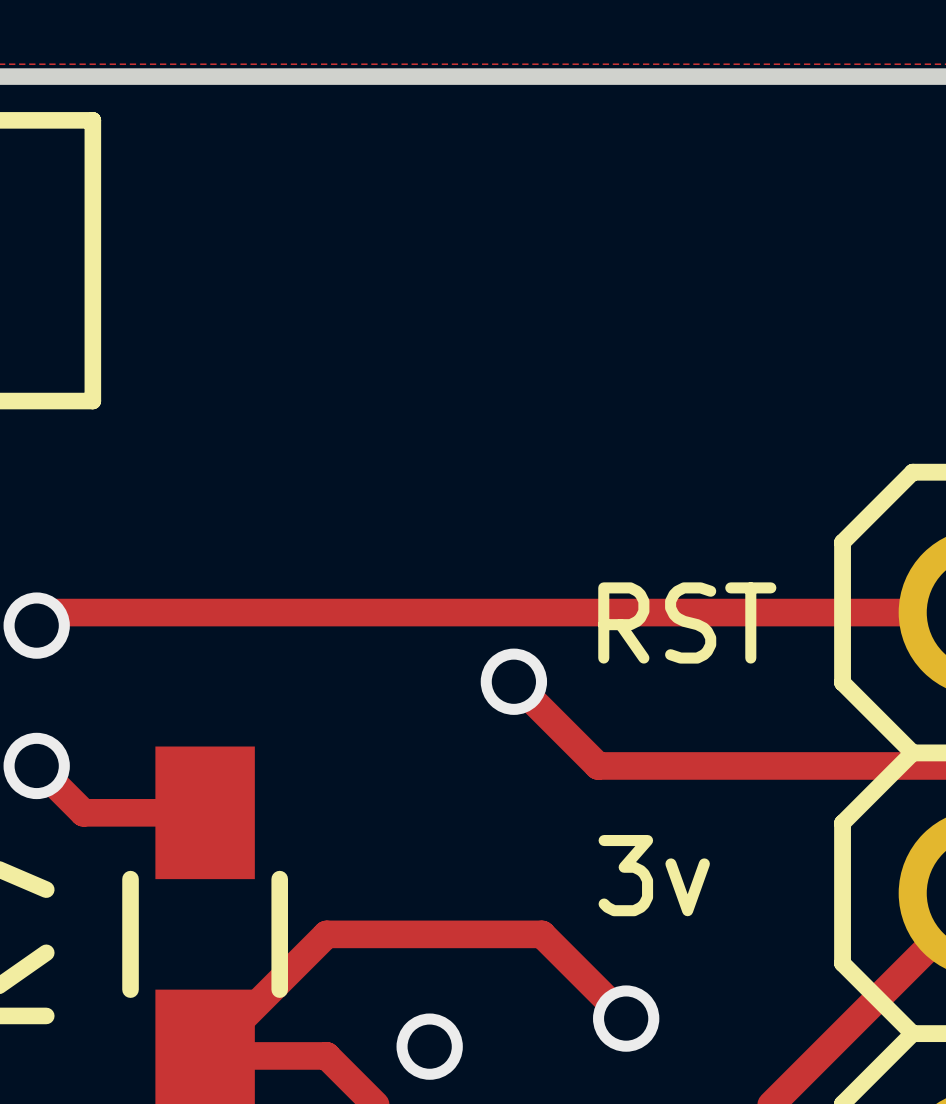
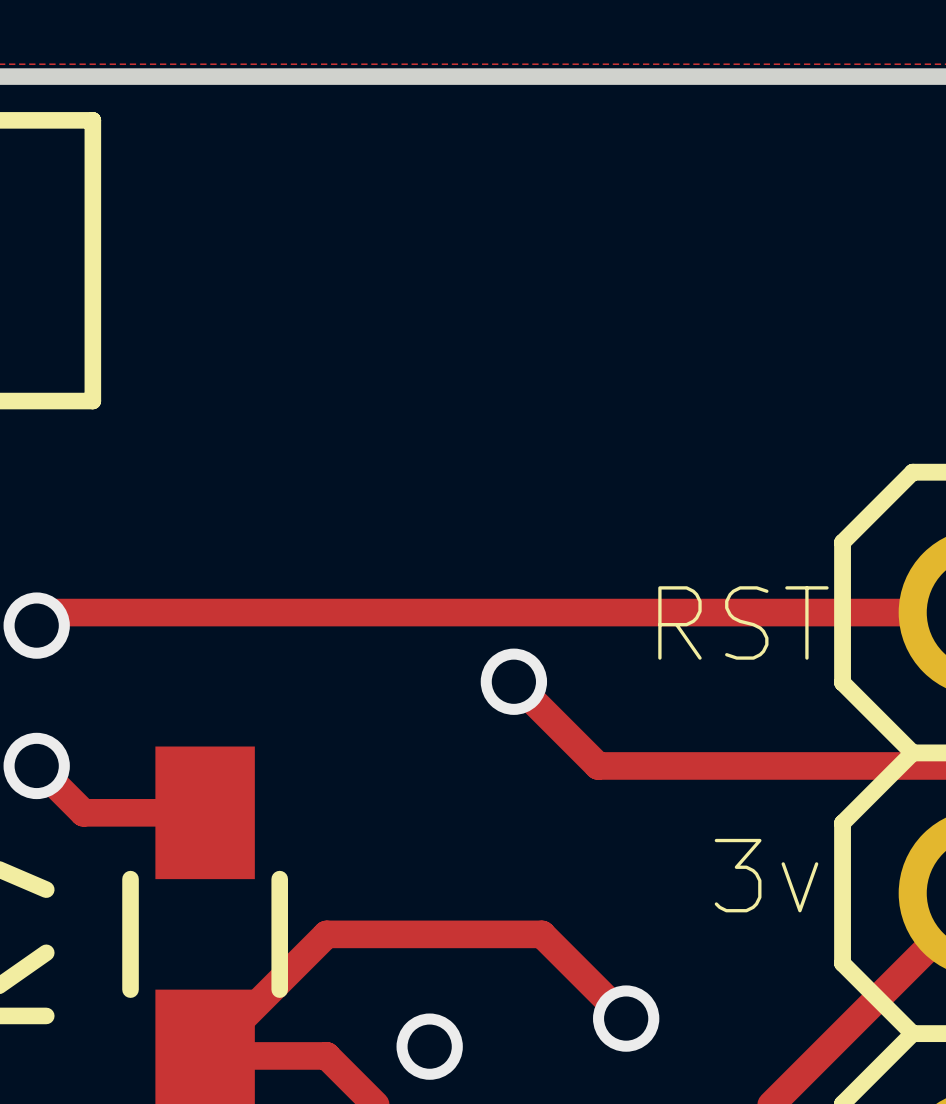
text position: RST (687, 622) -> RST (743, 622)
text position: 3v (654, 875) -> 3v (766, 875)

